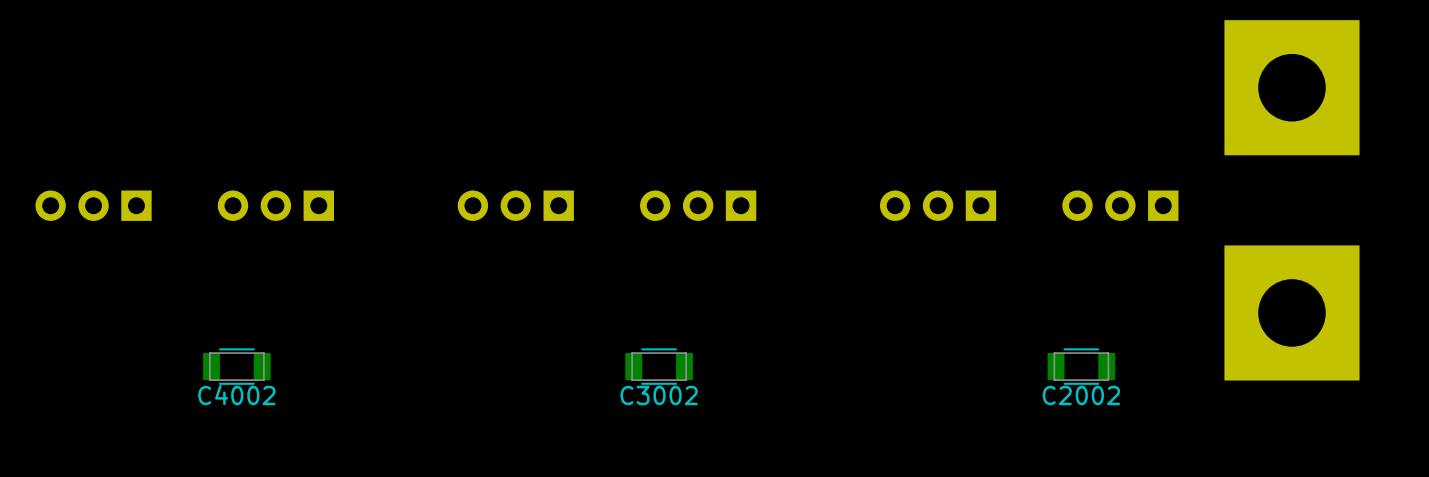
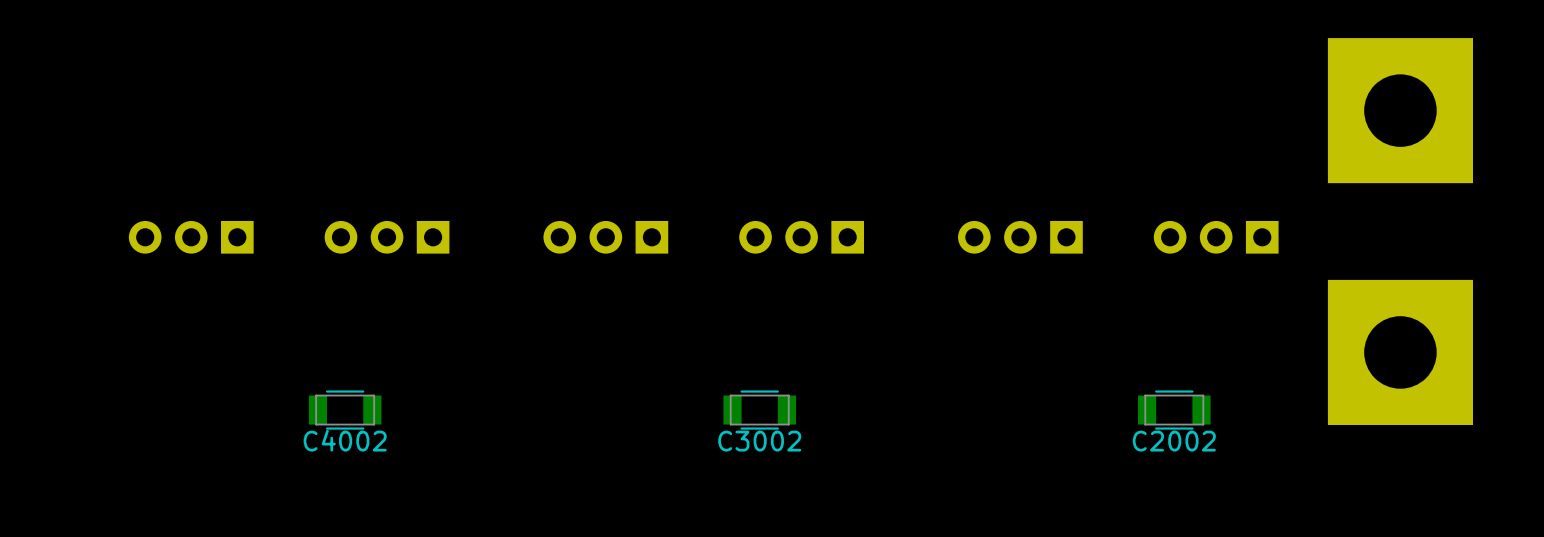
part: (93, 205) -> none
part: none -> (191, 237)
part: (275, 205) -> none
part: none -> (387, 237)
part position: (515, 205) -> (605, 237)
part position: (698, 205) -> (801, 237)
C4002 position: (236, 366) -> (345, 410)
C3002 position: (659, 366) -> (759, 410)

